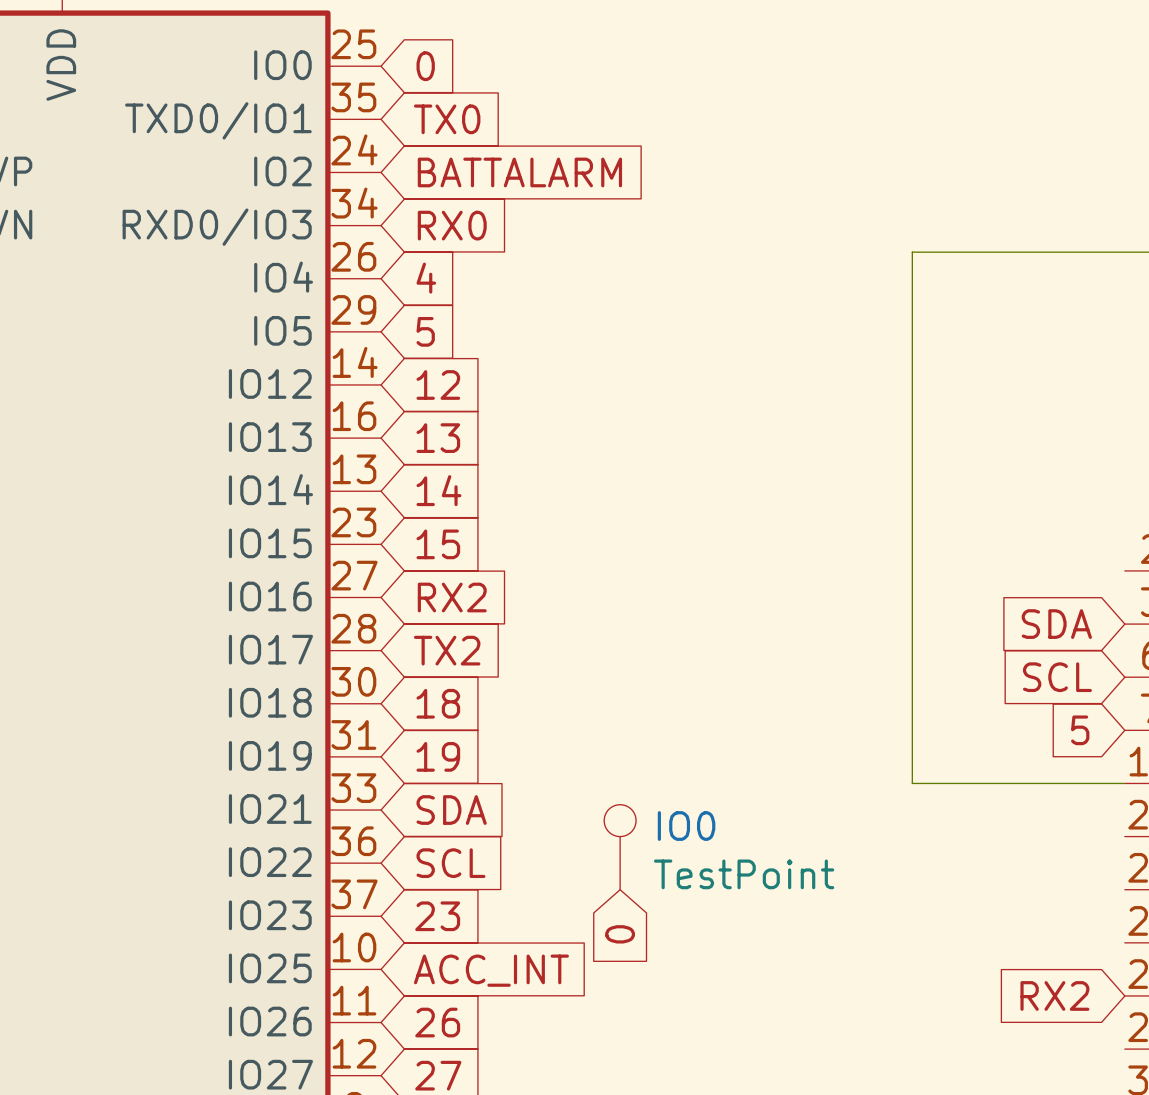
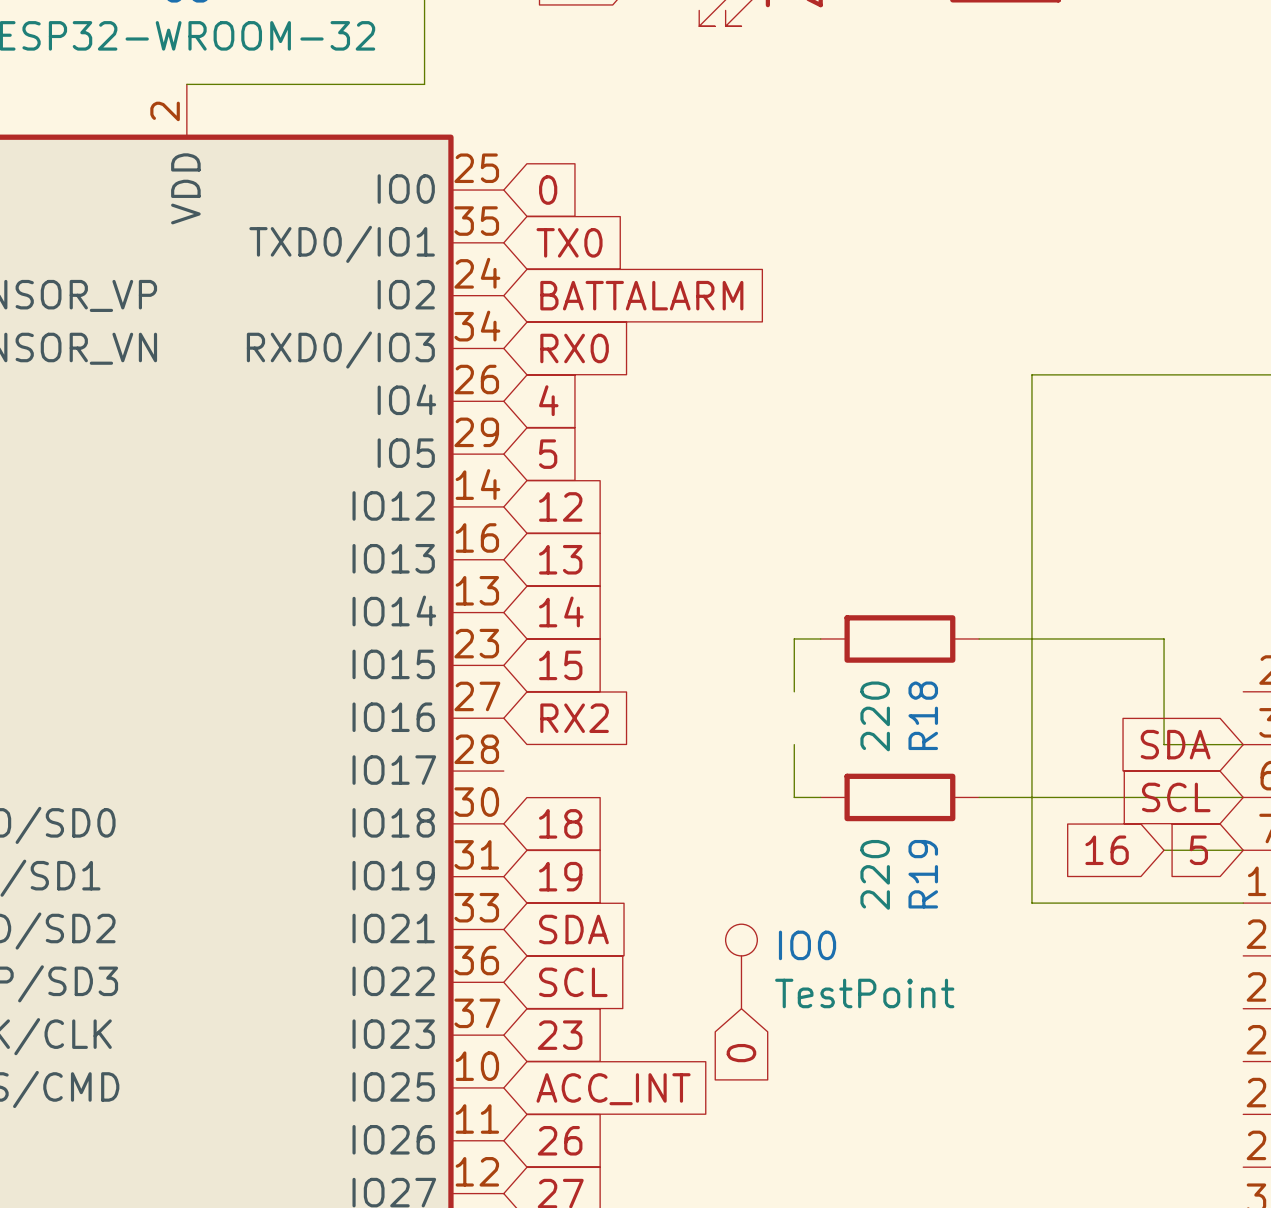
wire: none -> (820, 638) (794, 638) (794, 691)
R18: none -> 220 (899, 638)
wire: none -> (979, 638) (1164, 638) (1164, 744) (1243, 744)
wire: none -> (794, 744) (794, 797) (820, 797)
global label: TX2 (447, 650) -> none
R19: none -> 220 (899, 797)
wire: none -> (979, 797) (1243, 797)
global label: none -> 16 (1107, 850)
wire: none -> (1164, 850) (1243, 850)
global label: RX2 (1054, 995) -> none

